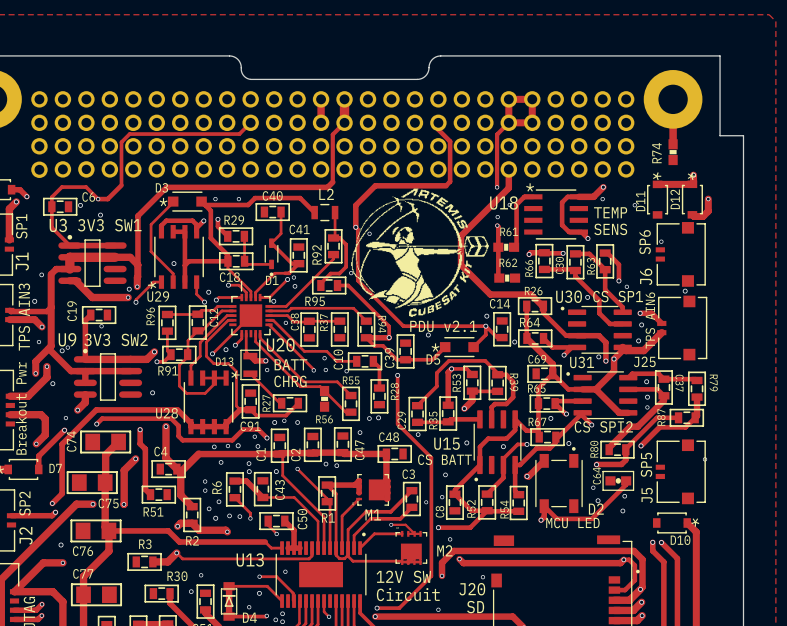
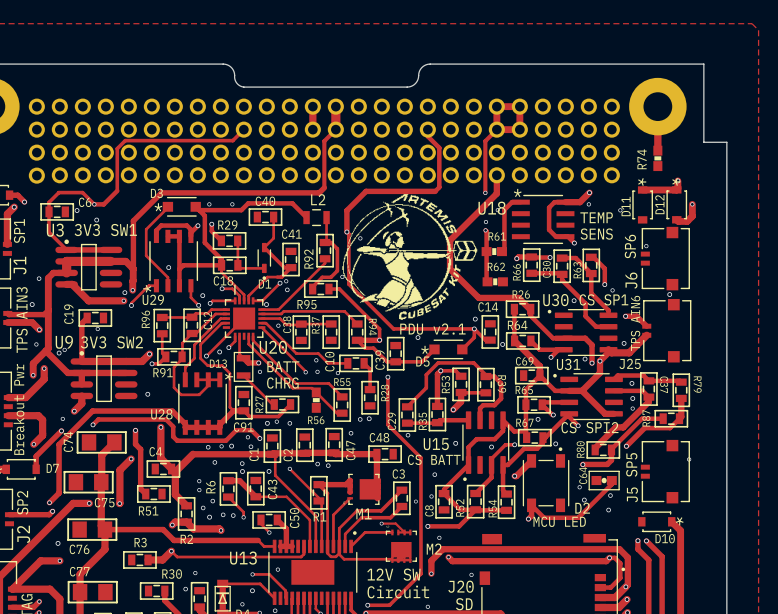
via: (641, 324) -> none
via: (52, 383) -> none

